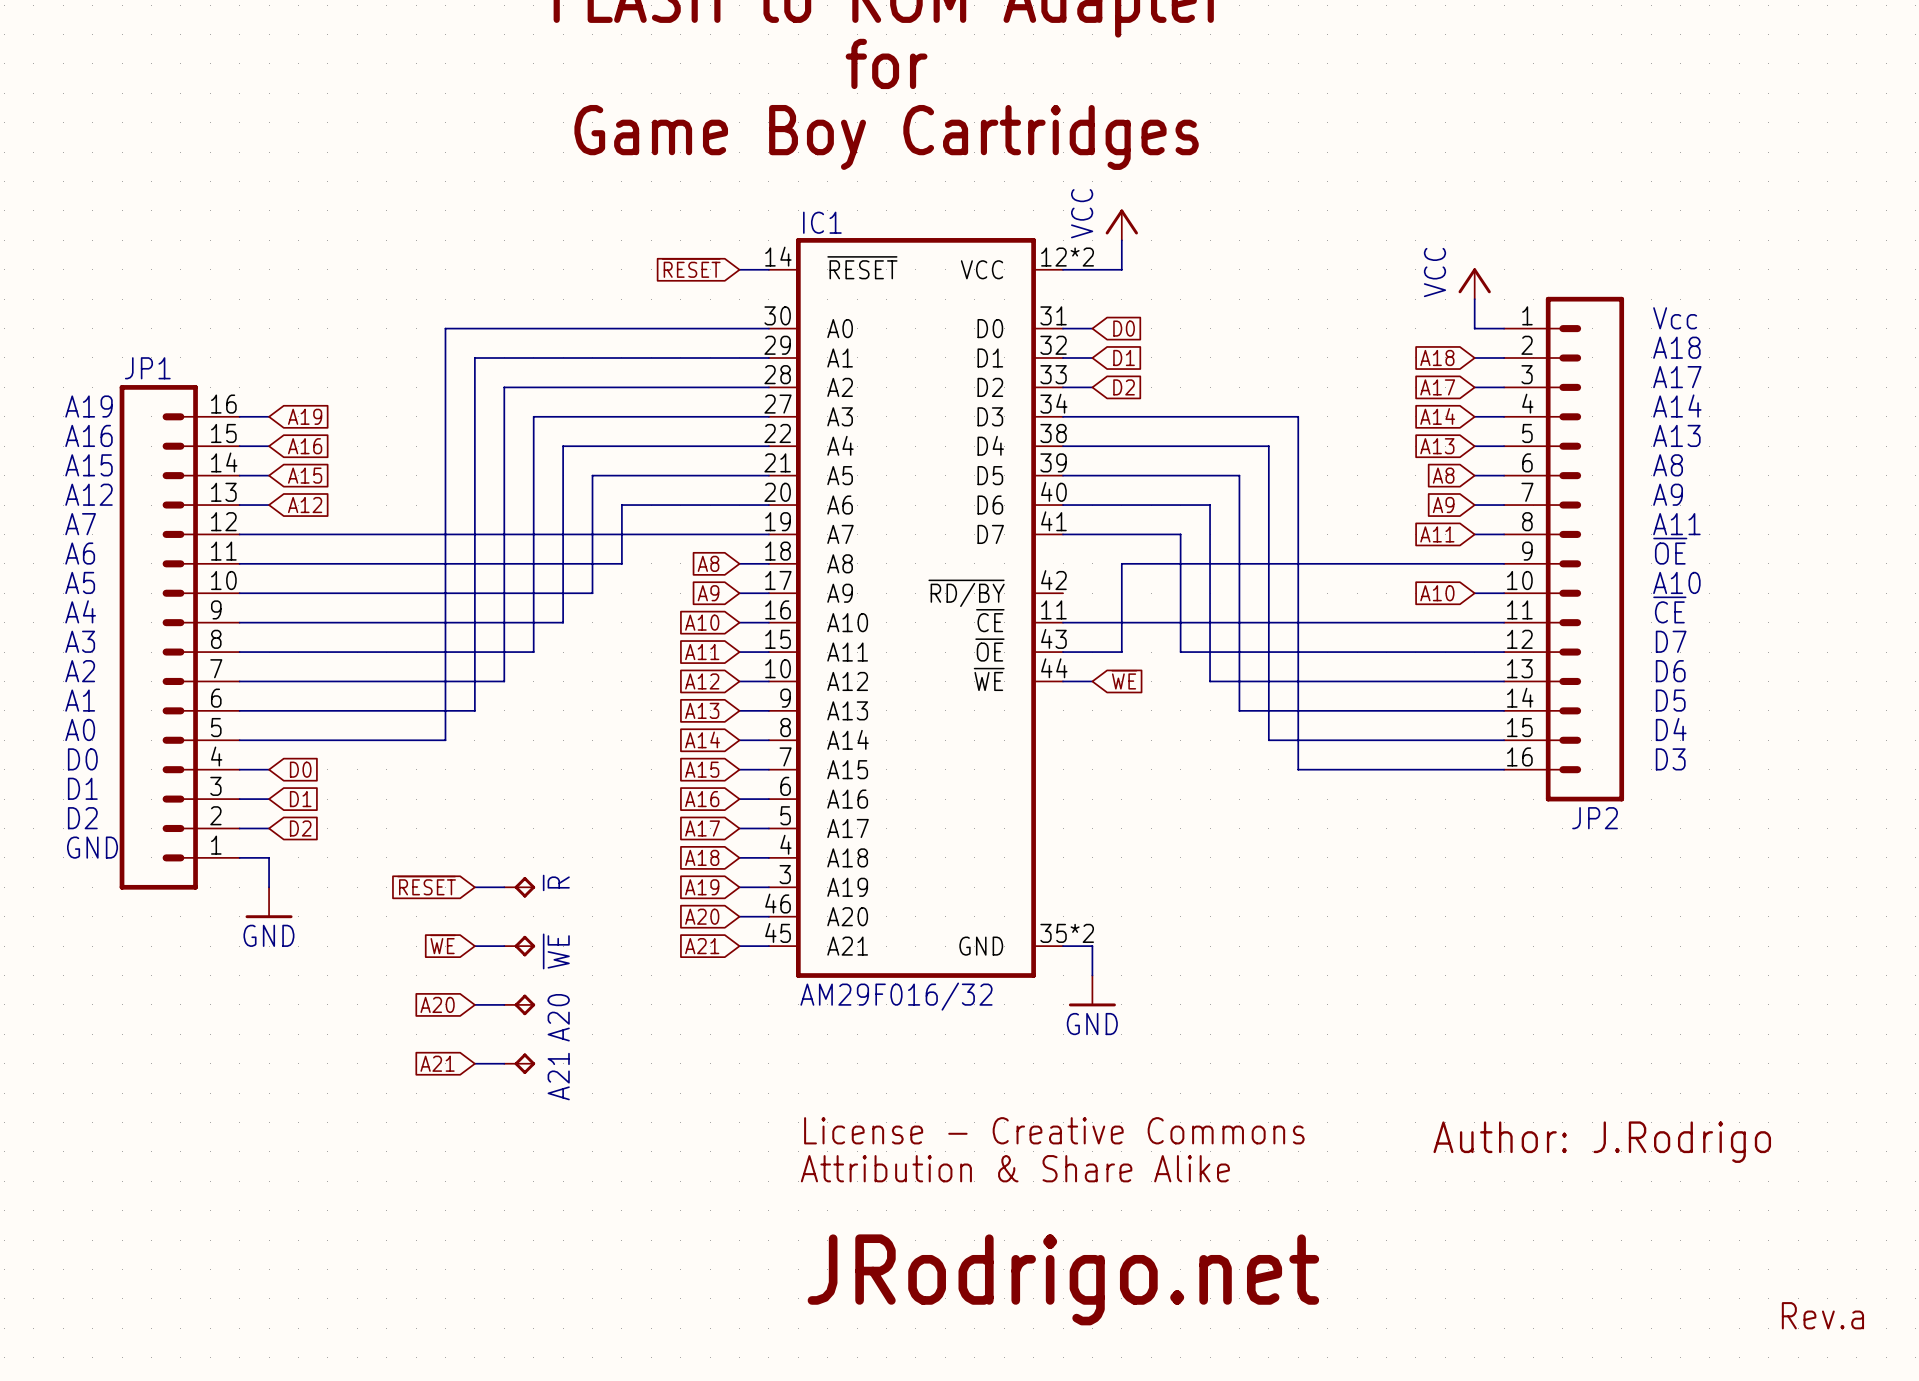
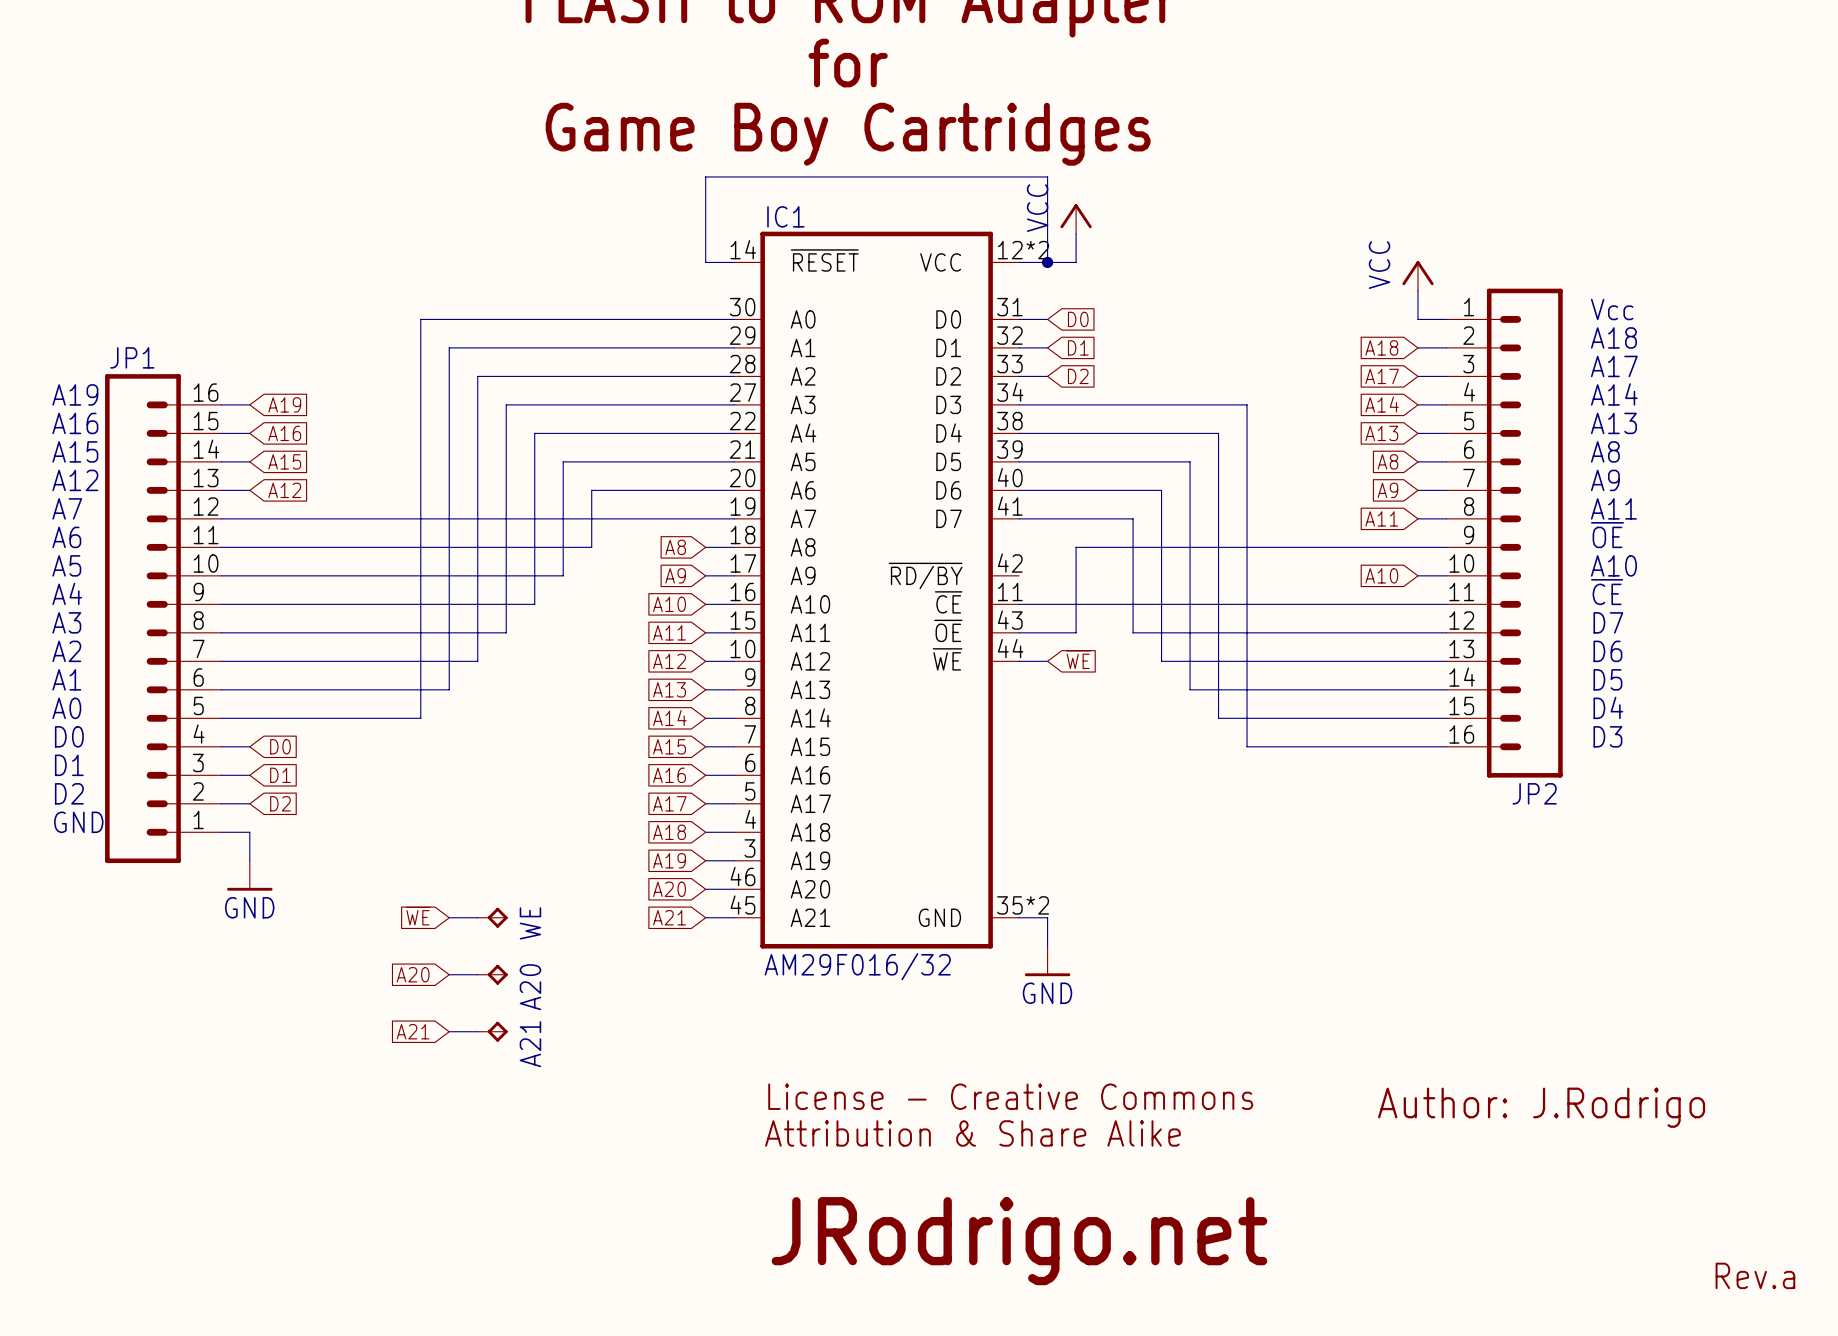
global label: ~{RESET} (691, 268) -> none
wire: none -> (705, 262) (705, 176) (1047, 176) (1047, 262)
junction: none -> (1047, 262)
global label: ~{RESET} (426, 885) -> none
wire: (474, 887) (504, 887) -> none
~{R}: (519, 887) -> none
~{WE} name: ~{WE} (556, 951) -> WE (530, 923)

